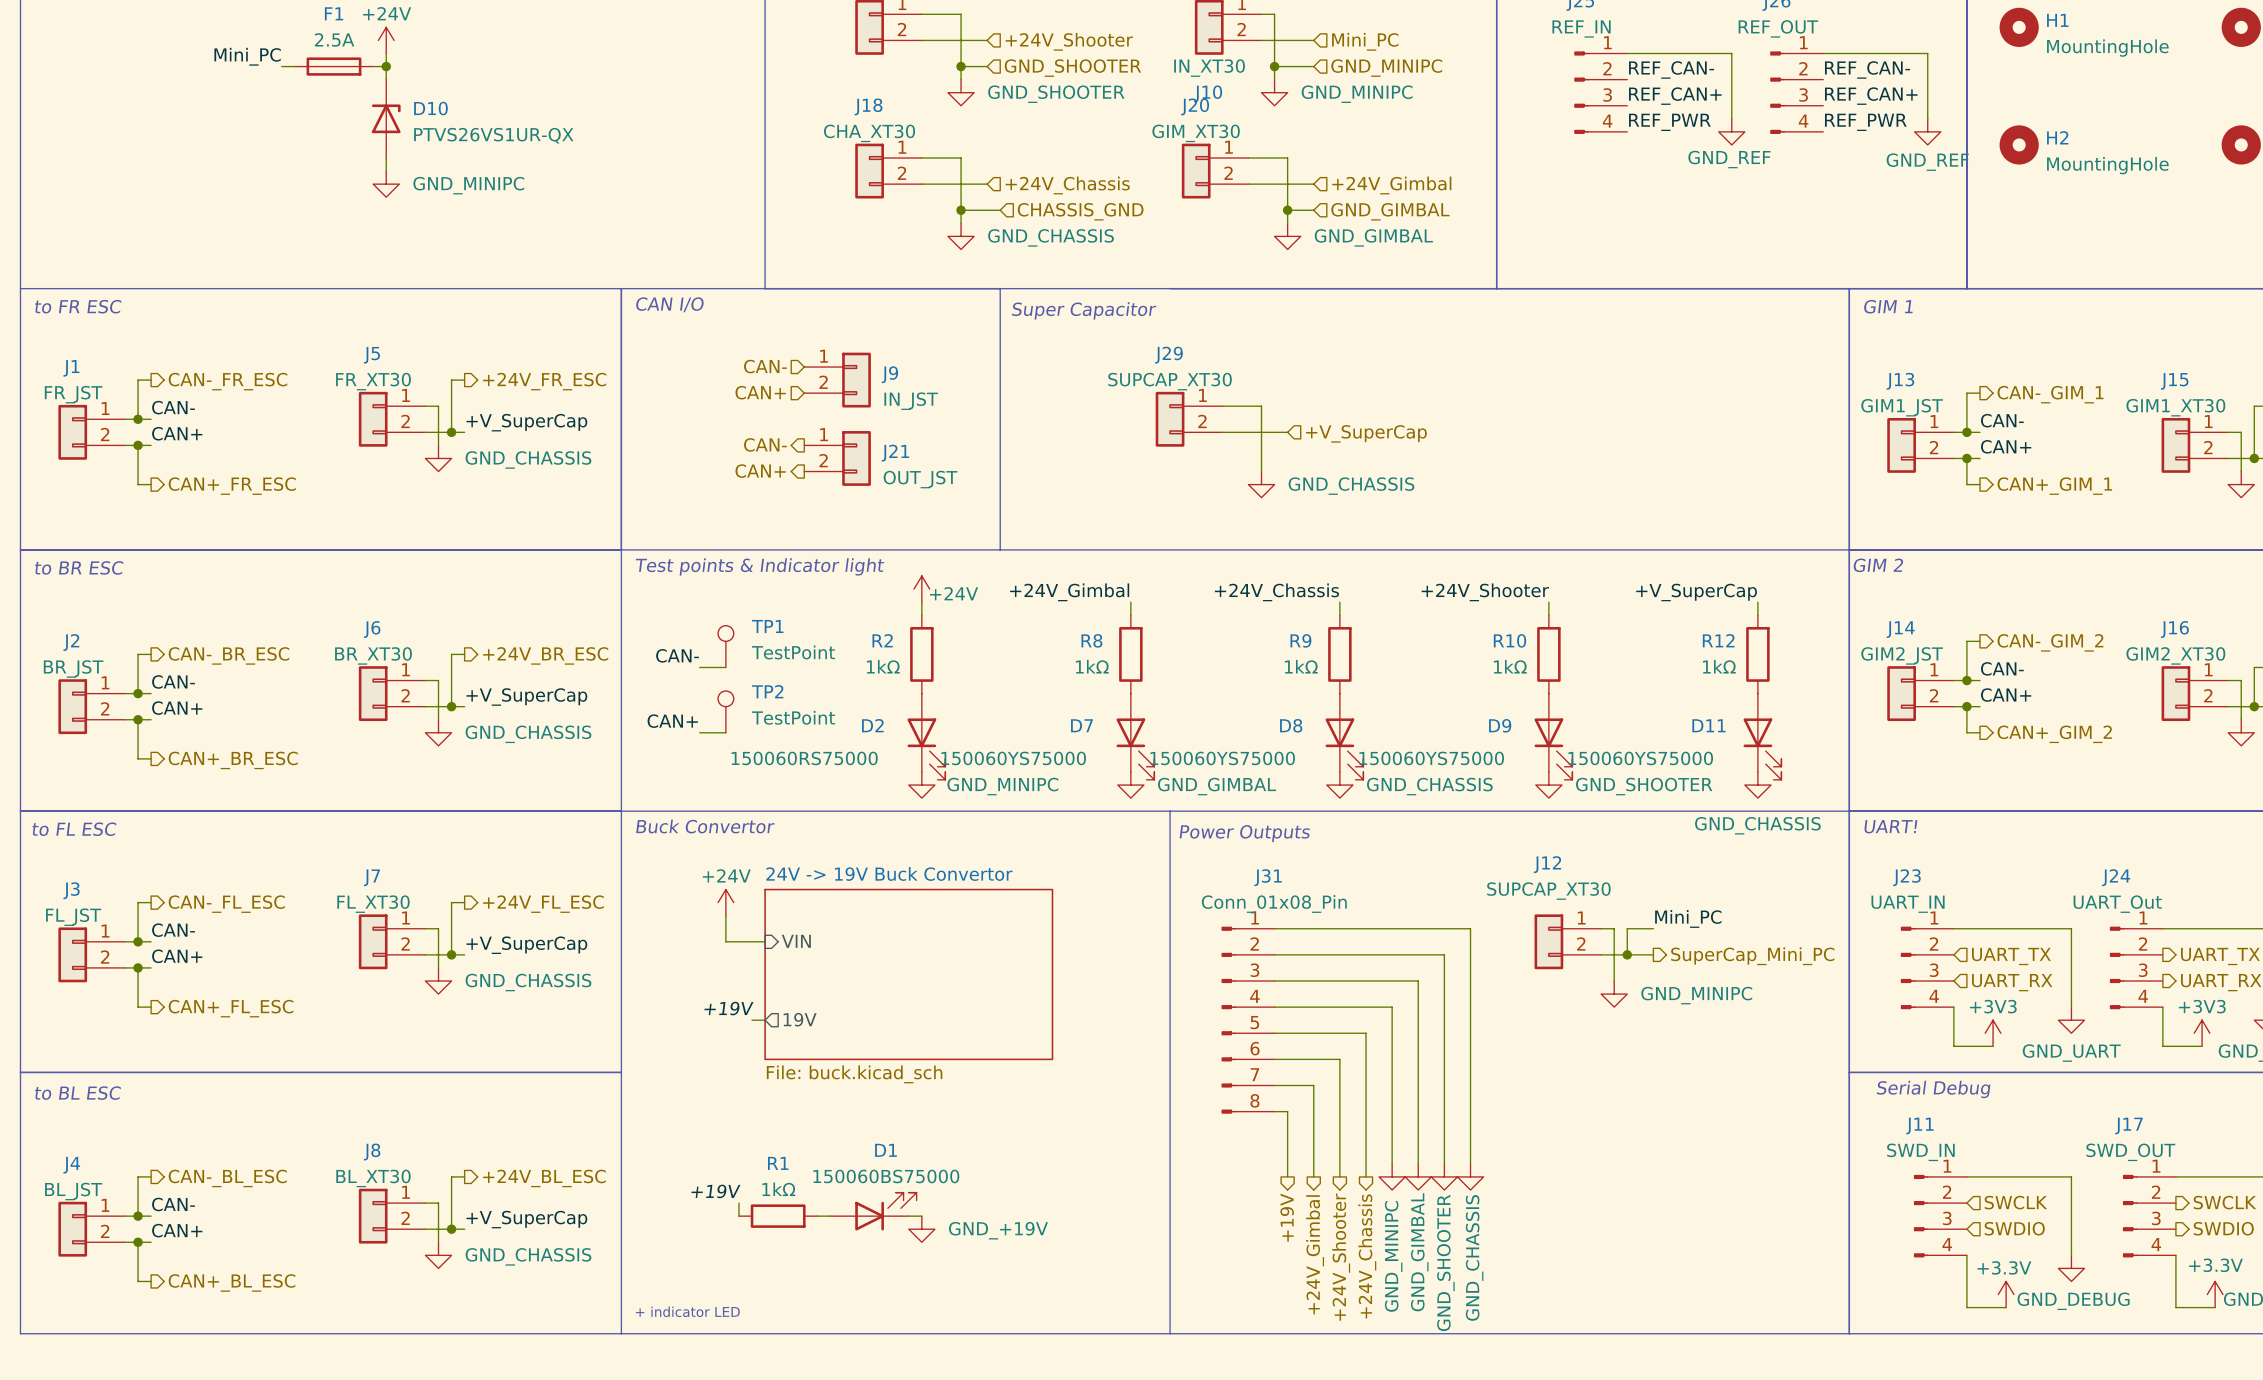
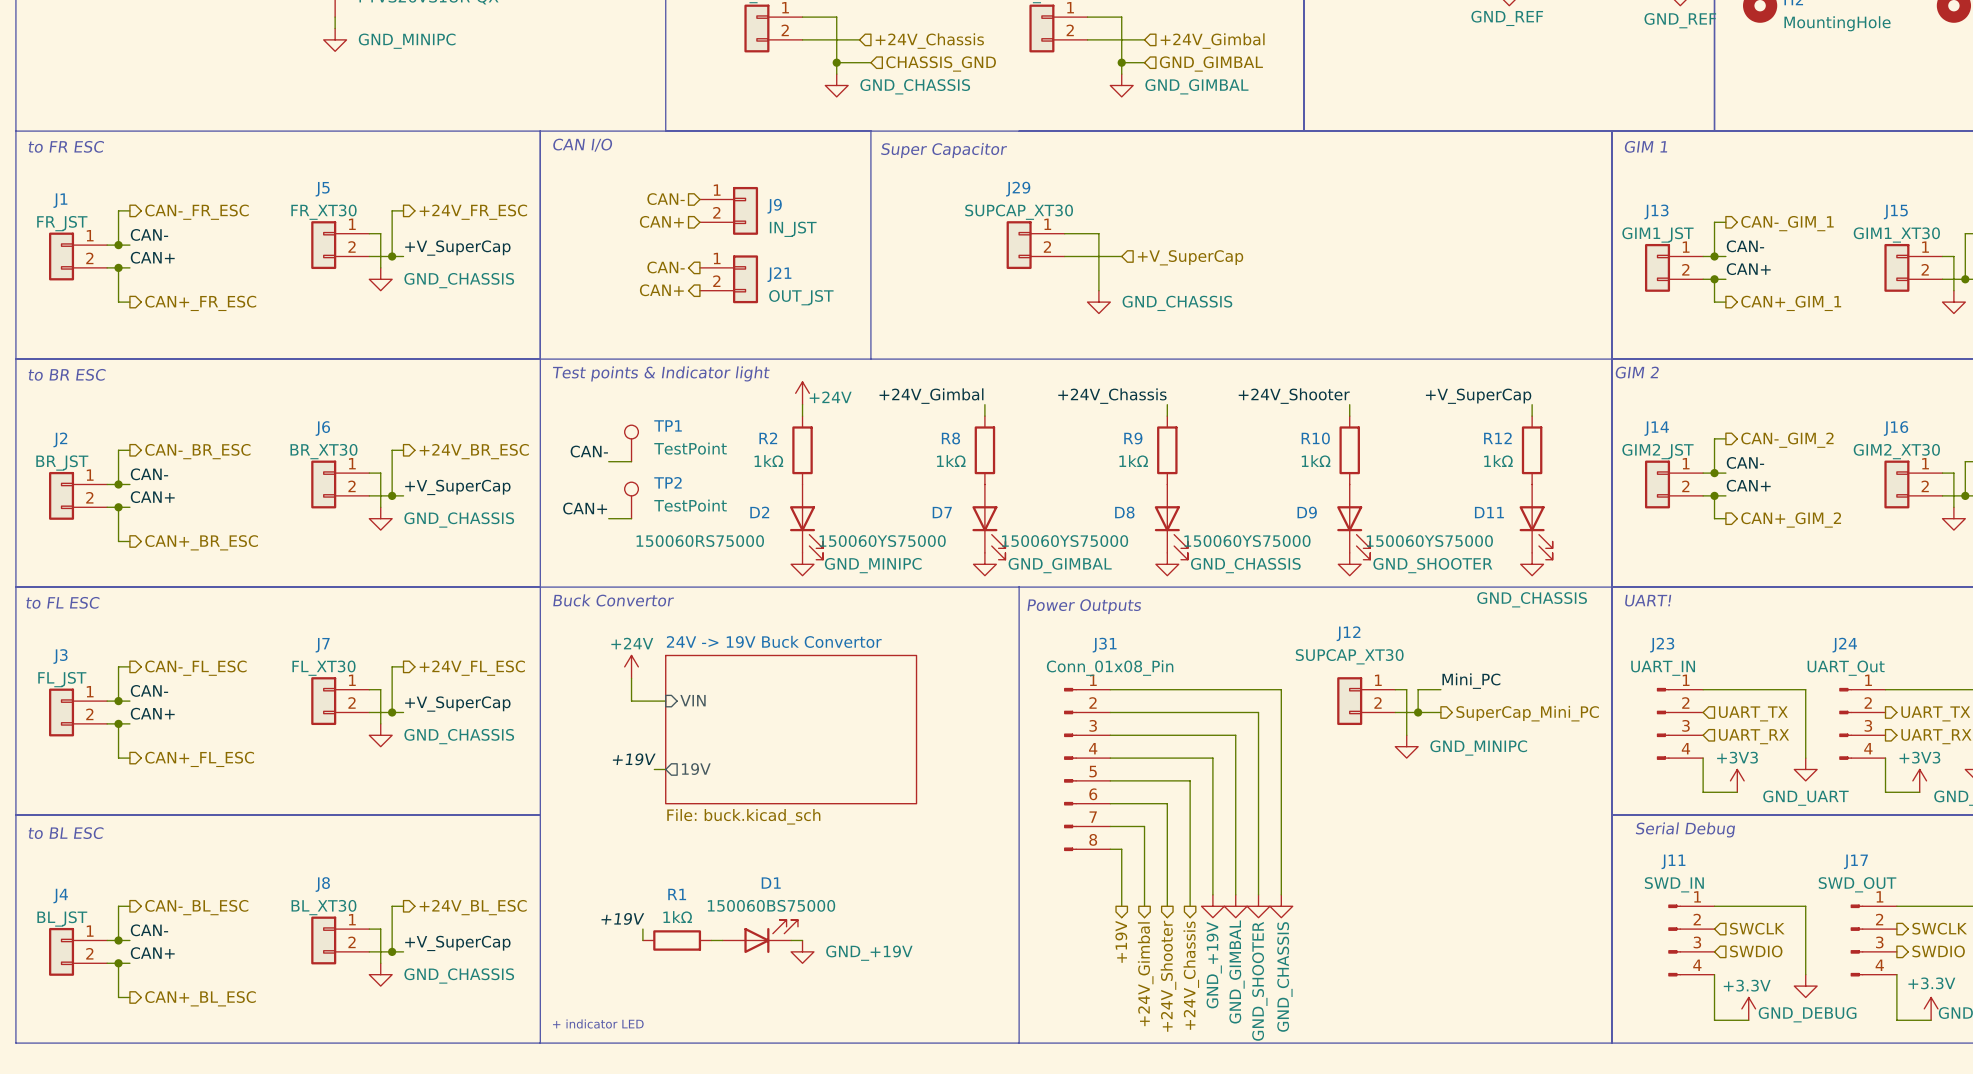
power symbol: GND_MINIPC (1392, 1176) -> GND_+19V (1212, 906)

